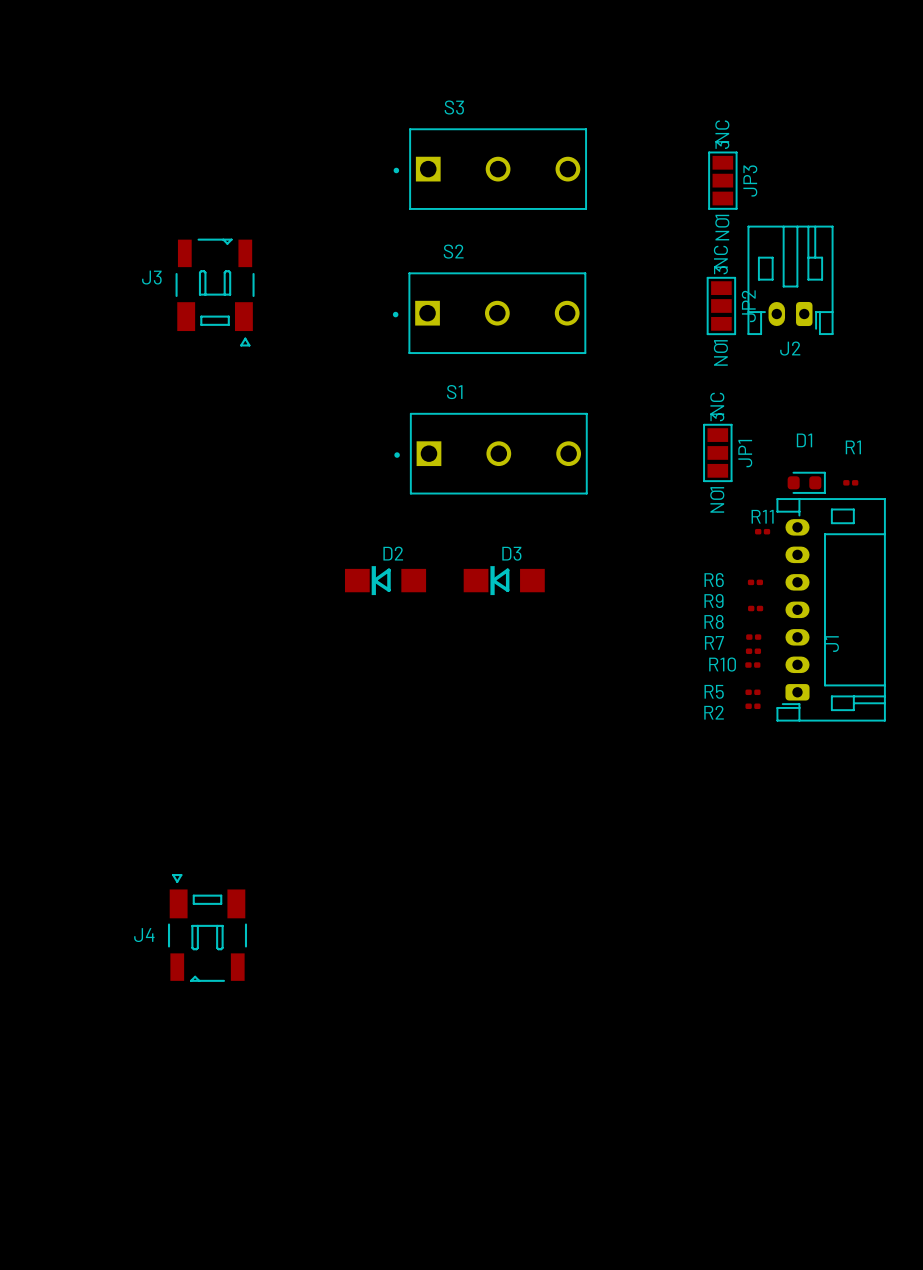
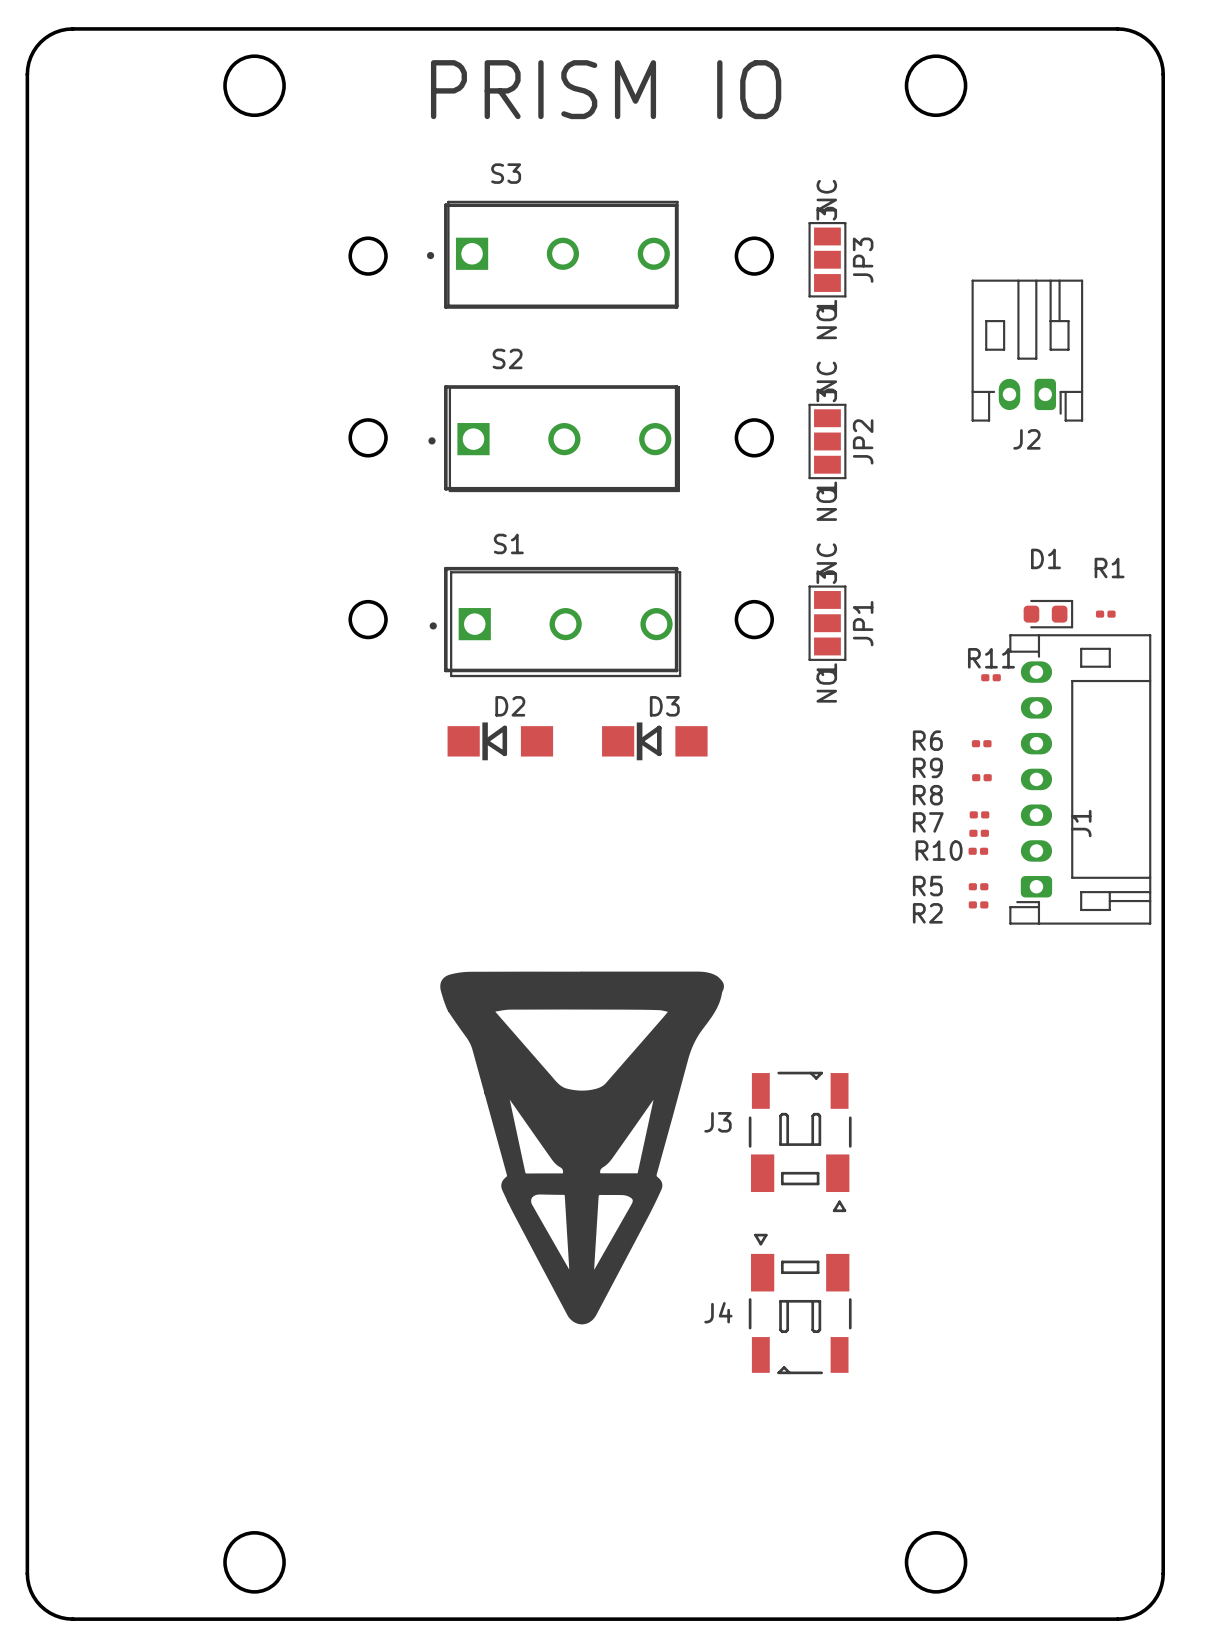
board edge: none -> (72, 28) (1117, 28) (1129, 30) (1140, 35) (1153, 46) (1161, 62) (1163, 74) (1163, 1573) (1159, 1591) (1153, 1601) (1145, 1609) (1135, 1615) (1117, 1619) (72, 1619) (55, 1615) (45, 1609) (36, 1601) (28, 1585) (27, 1573) (27, 74) (30, 56) (40, 42) (55, 32) (72, 28)
round board edge: none -> [223, 54, 286, 118]
round board edge: none -> [904, 54, 968, 118]
text: none -> PRISM IO (606, 89)
line: none -> (445, 205) (676, 205) (676, 306) (445, 306) (445, 205)
S3 position: (490, 169) -> (552, 253)
JP3 position: (722, 180) -> (827, 259)
round board edge: none -> [348, 236, 388, 276]
round board edge: none -> [734, 236, 774, 276]
J3 position: (215, 292) -> (800, 1141)
JP2 position: (721, 305) -> (827, 441)
line: none -> (445, 386) (445, 488) (676, 488) (676, 386) (445, 386)
S2 position: (489, 313) -> (554, 439)
round board edge: none -> [348, 418, 388, 458]
round board edge: none -> [734, 418, 774, 458]
line: none -> (445, 568) (676, 568) (676, 670) (445, 670) (445, 568)
JP1 position: (717, 452) -> (827, 623)
S1 position: (490, 453) -> (555, 624)
round board edge: none -> [348, 599, 388, 640]
round board edge: none -> [734, 599, 774, 640]
drawing: none -> [440, 971, 724, 1325]
J4 position: (207, 927) -> (800, 1303)
round board edge: none -> [223, 1531, 286, 1594]
round board edge: none -> [904, 1531, 968, 1594]

